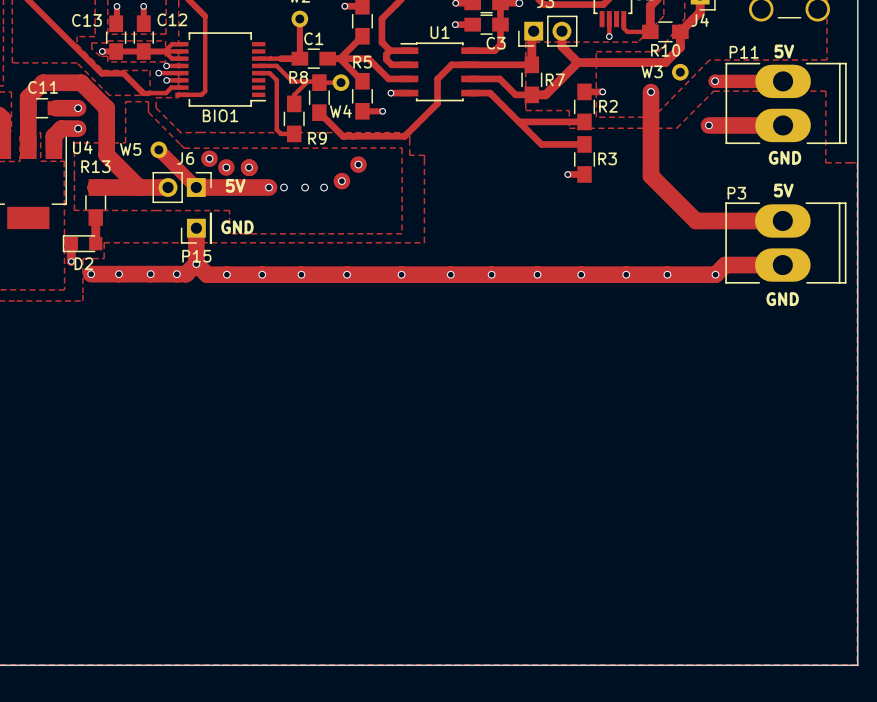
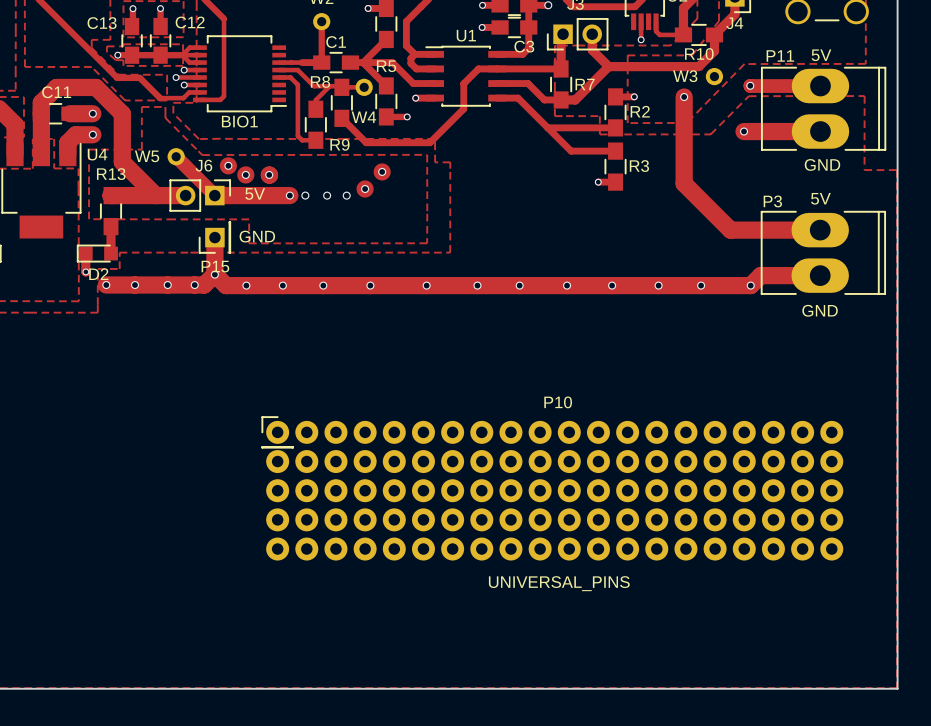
P10: none -> (552, 488)
text: none -> UNIVERSAL_PINS (559, 583)

